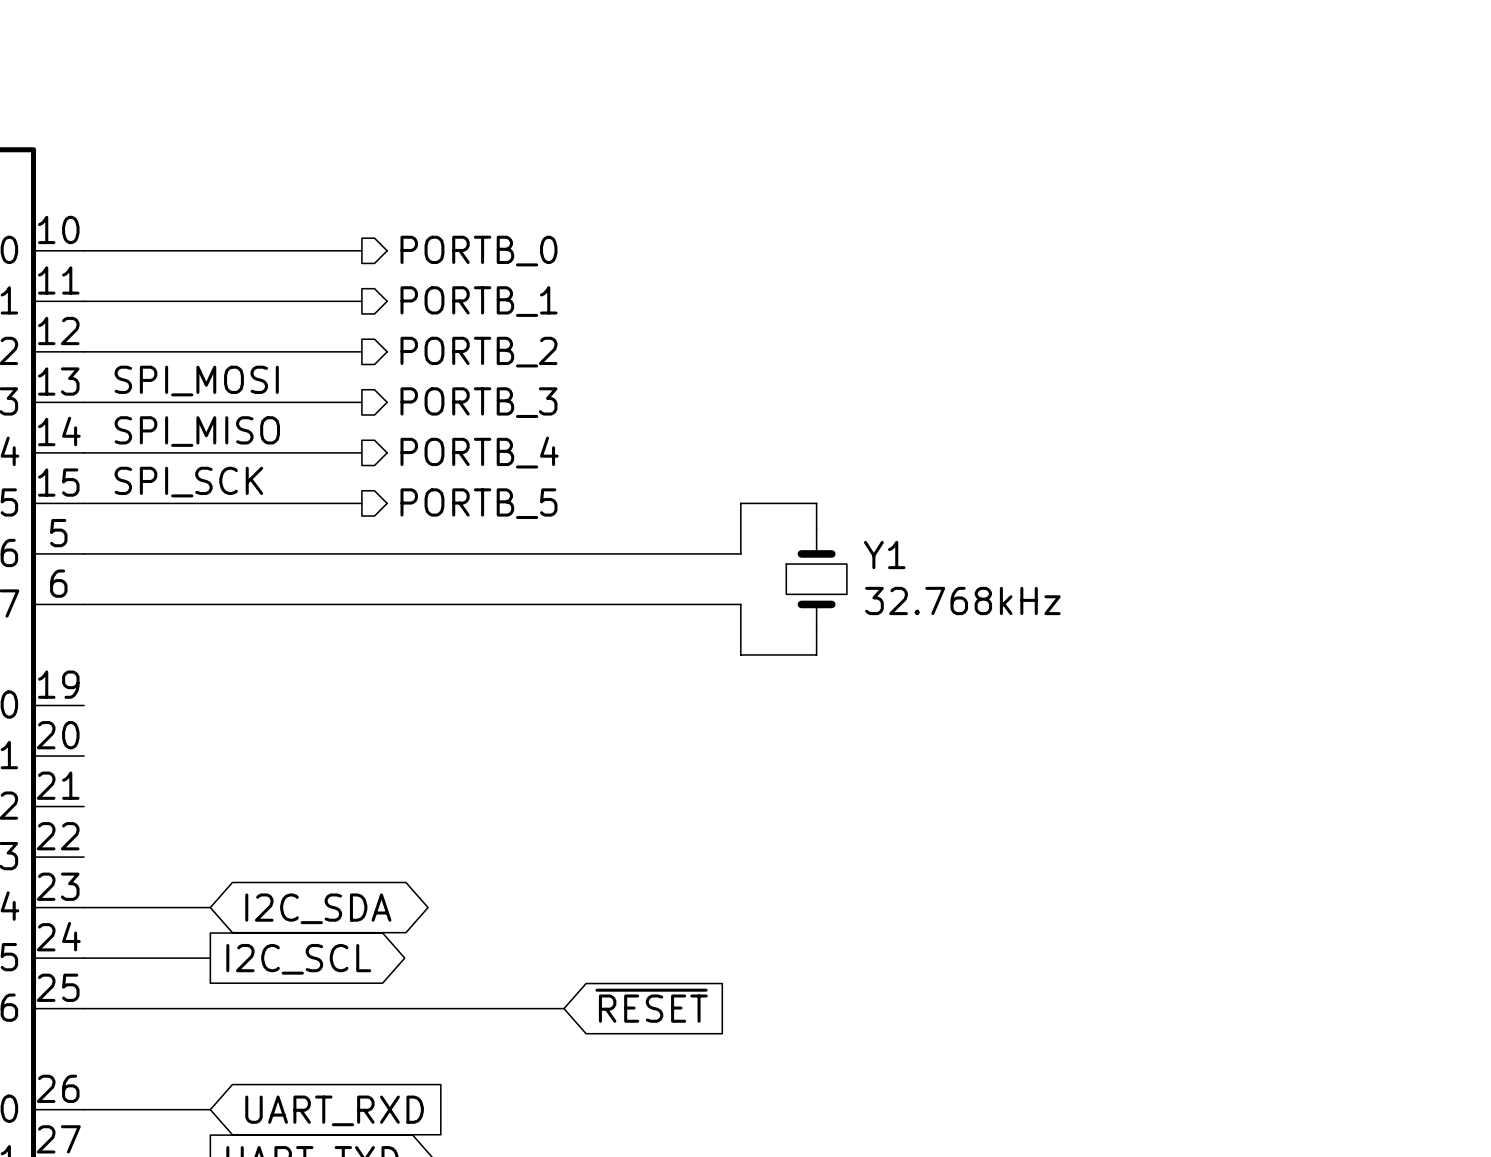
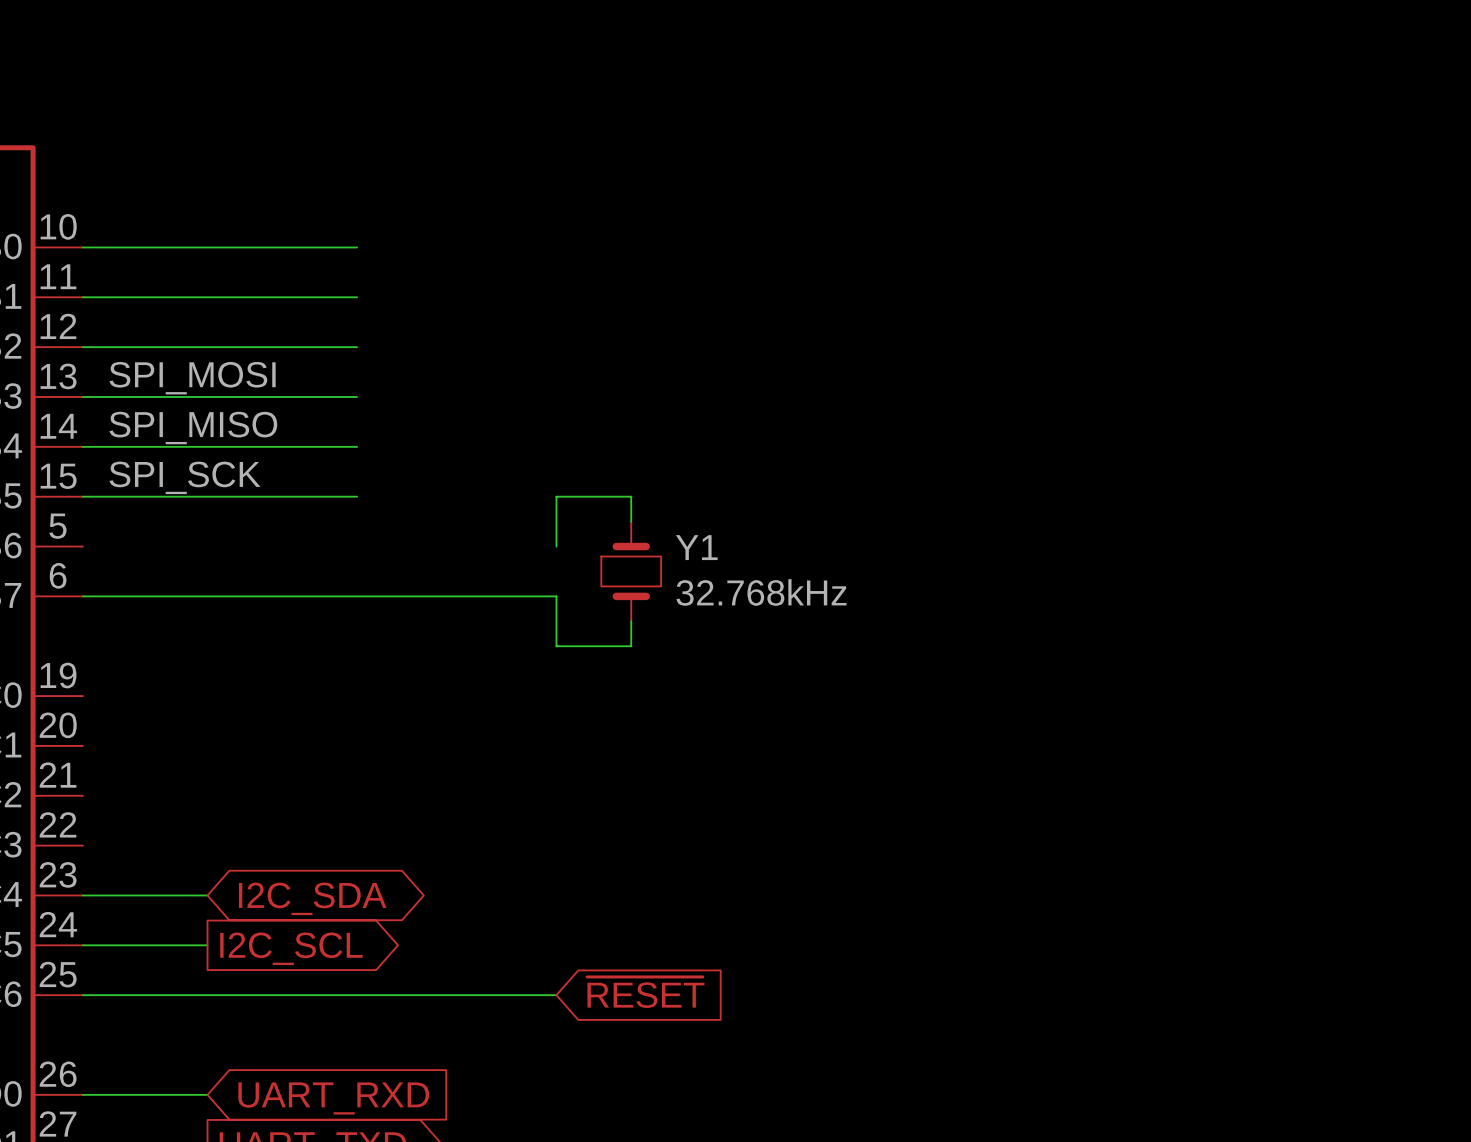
hierarchical label: PORTB_0 (478, 251) -> none
hierarchical label: PORTB_1 (478, 301) -> none
hierarchical label: PORTB_2 (478, 352) -> none
hierarchical label: PORTB_3 (478, 402) -> none
hierarchical label: PORTB_4 (479, 452) -> none
hierarchical label: PORTB_5 (478, 503) -> none
wire: none -> (631, 521) (631, 496) (556, 496) (556, 546)
wire: (816, 528) (816, 503) (740, 503) (740, 553) (84, 553) -> none
Y1 position: (816, 579) -> (631, 571)
wire: (563, 604) (740, 604) (740, 654) (816, 654) (816, 629) -> (556, 596) (556, 646) (631, 646) (631, 621)

